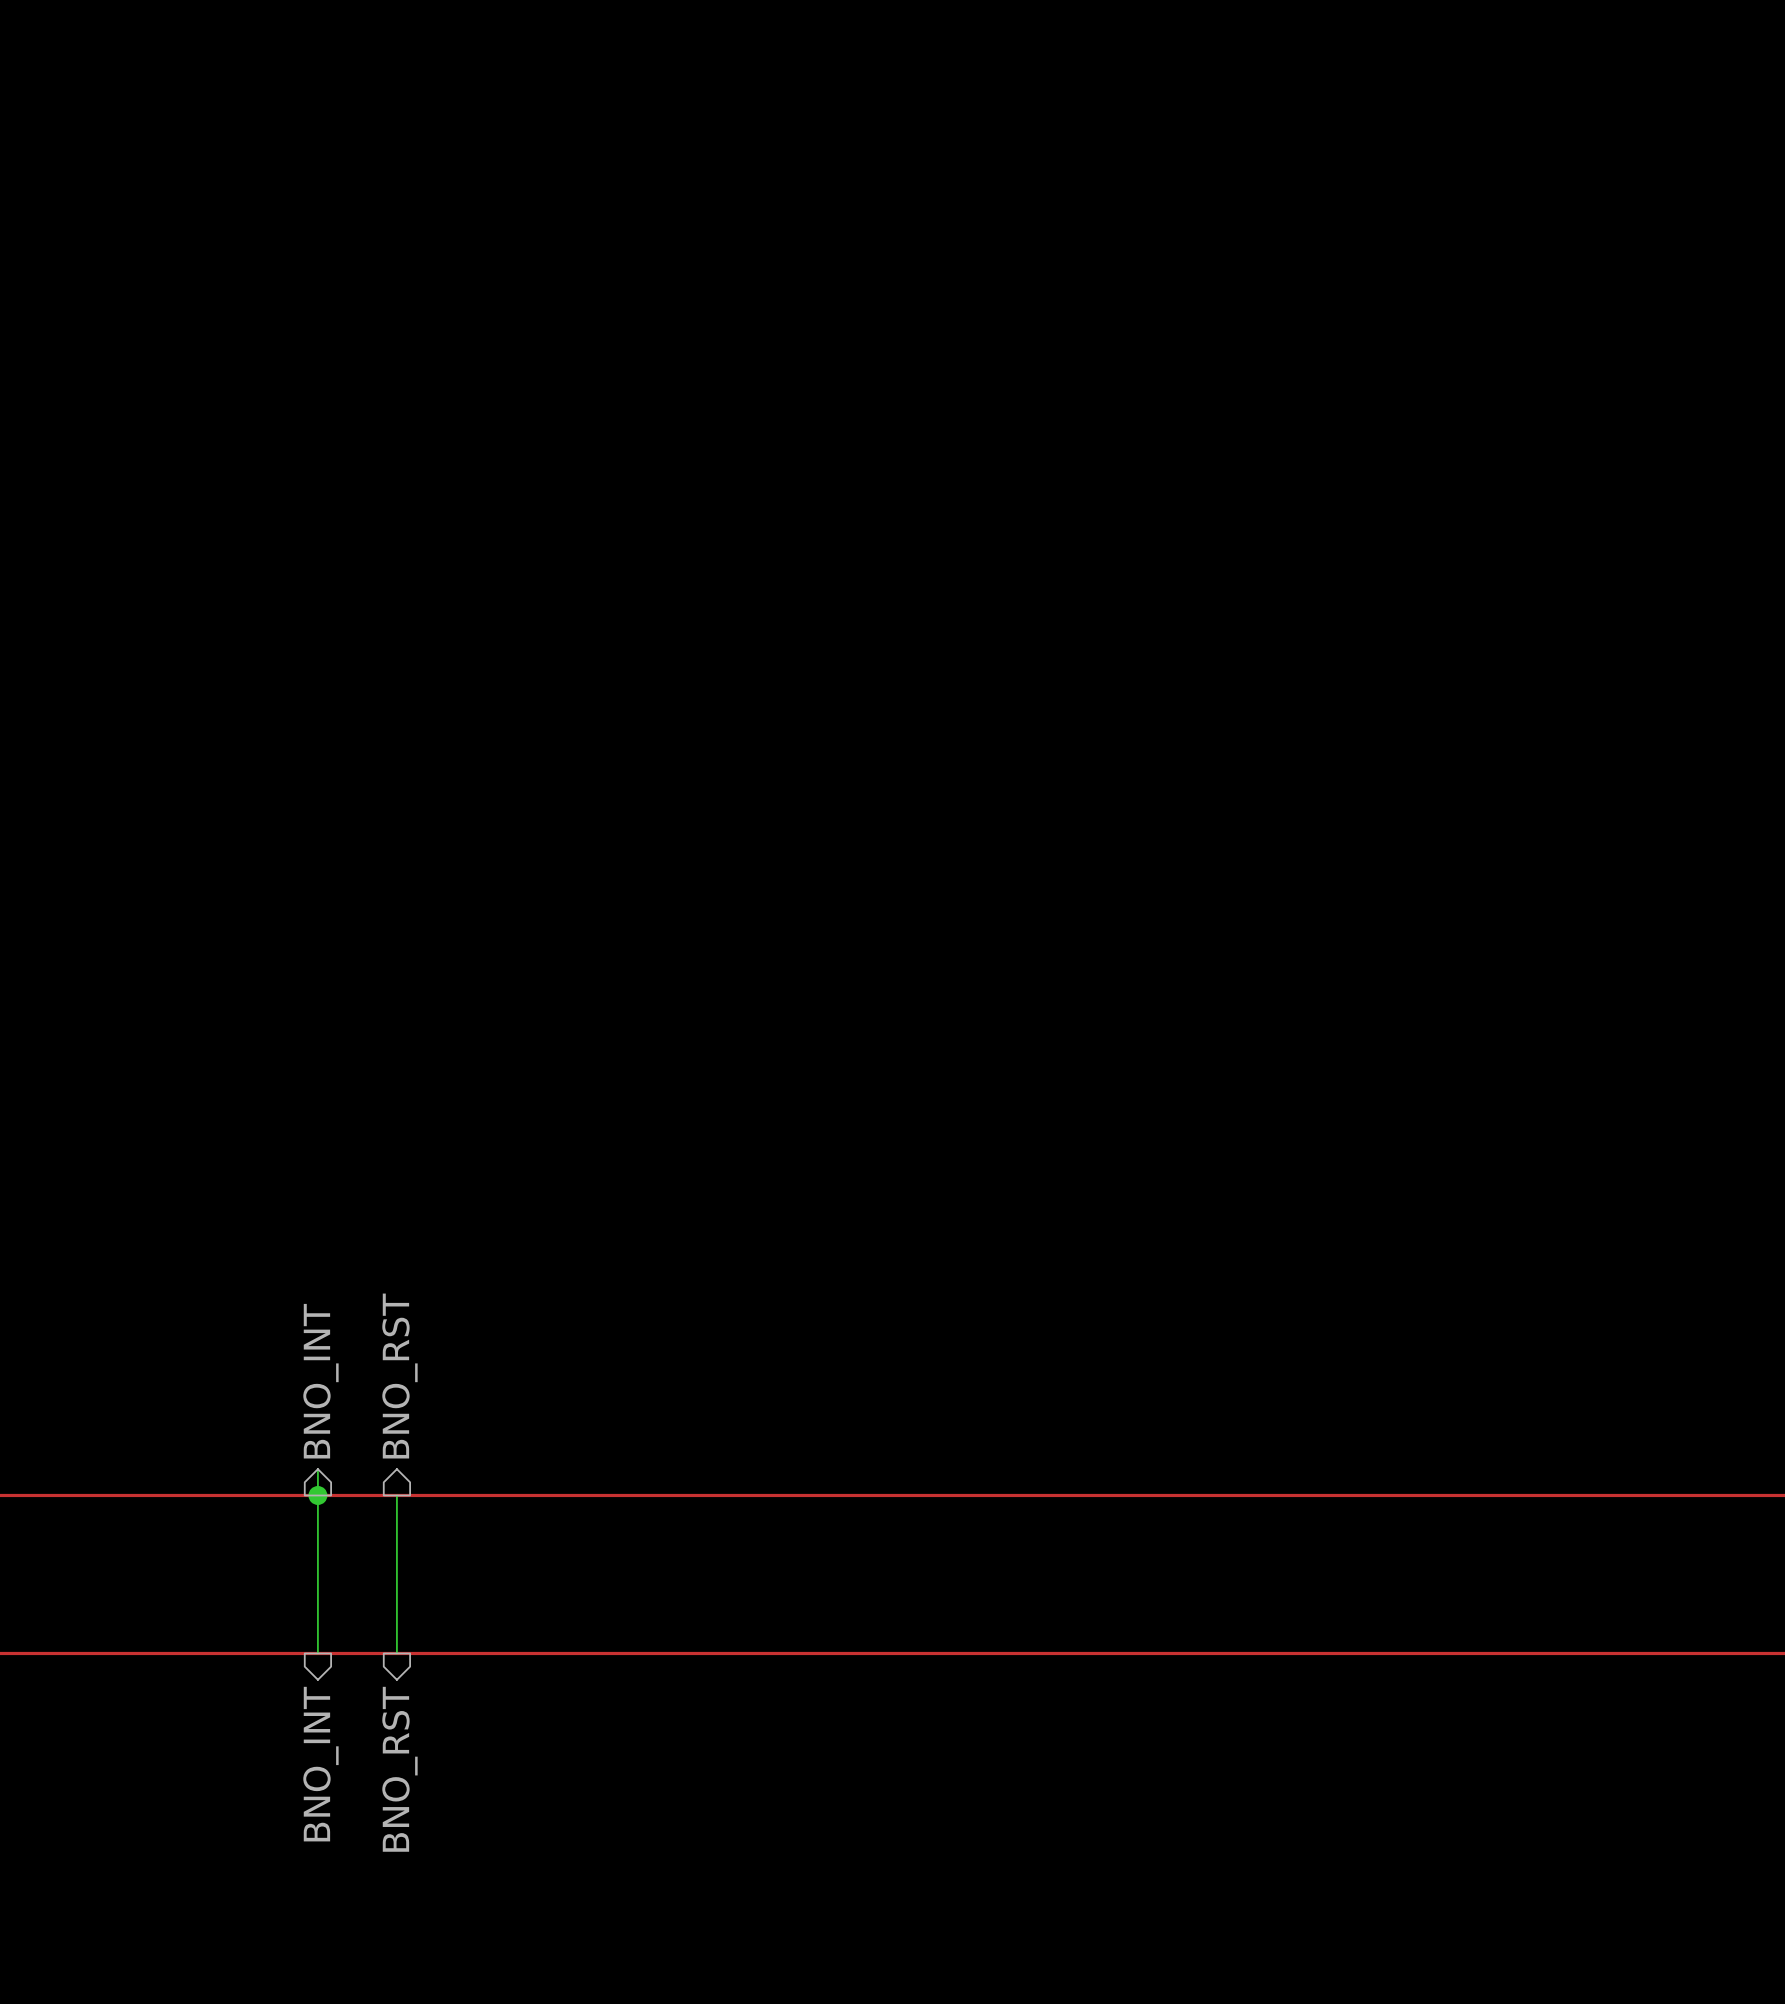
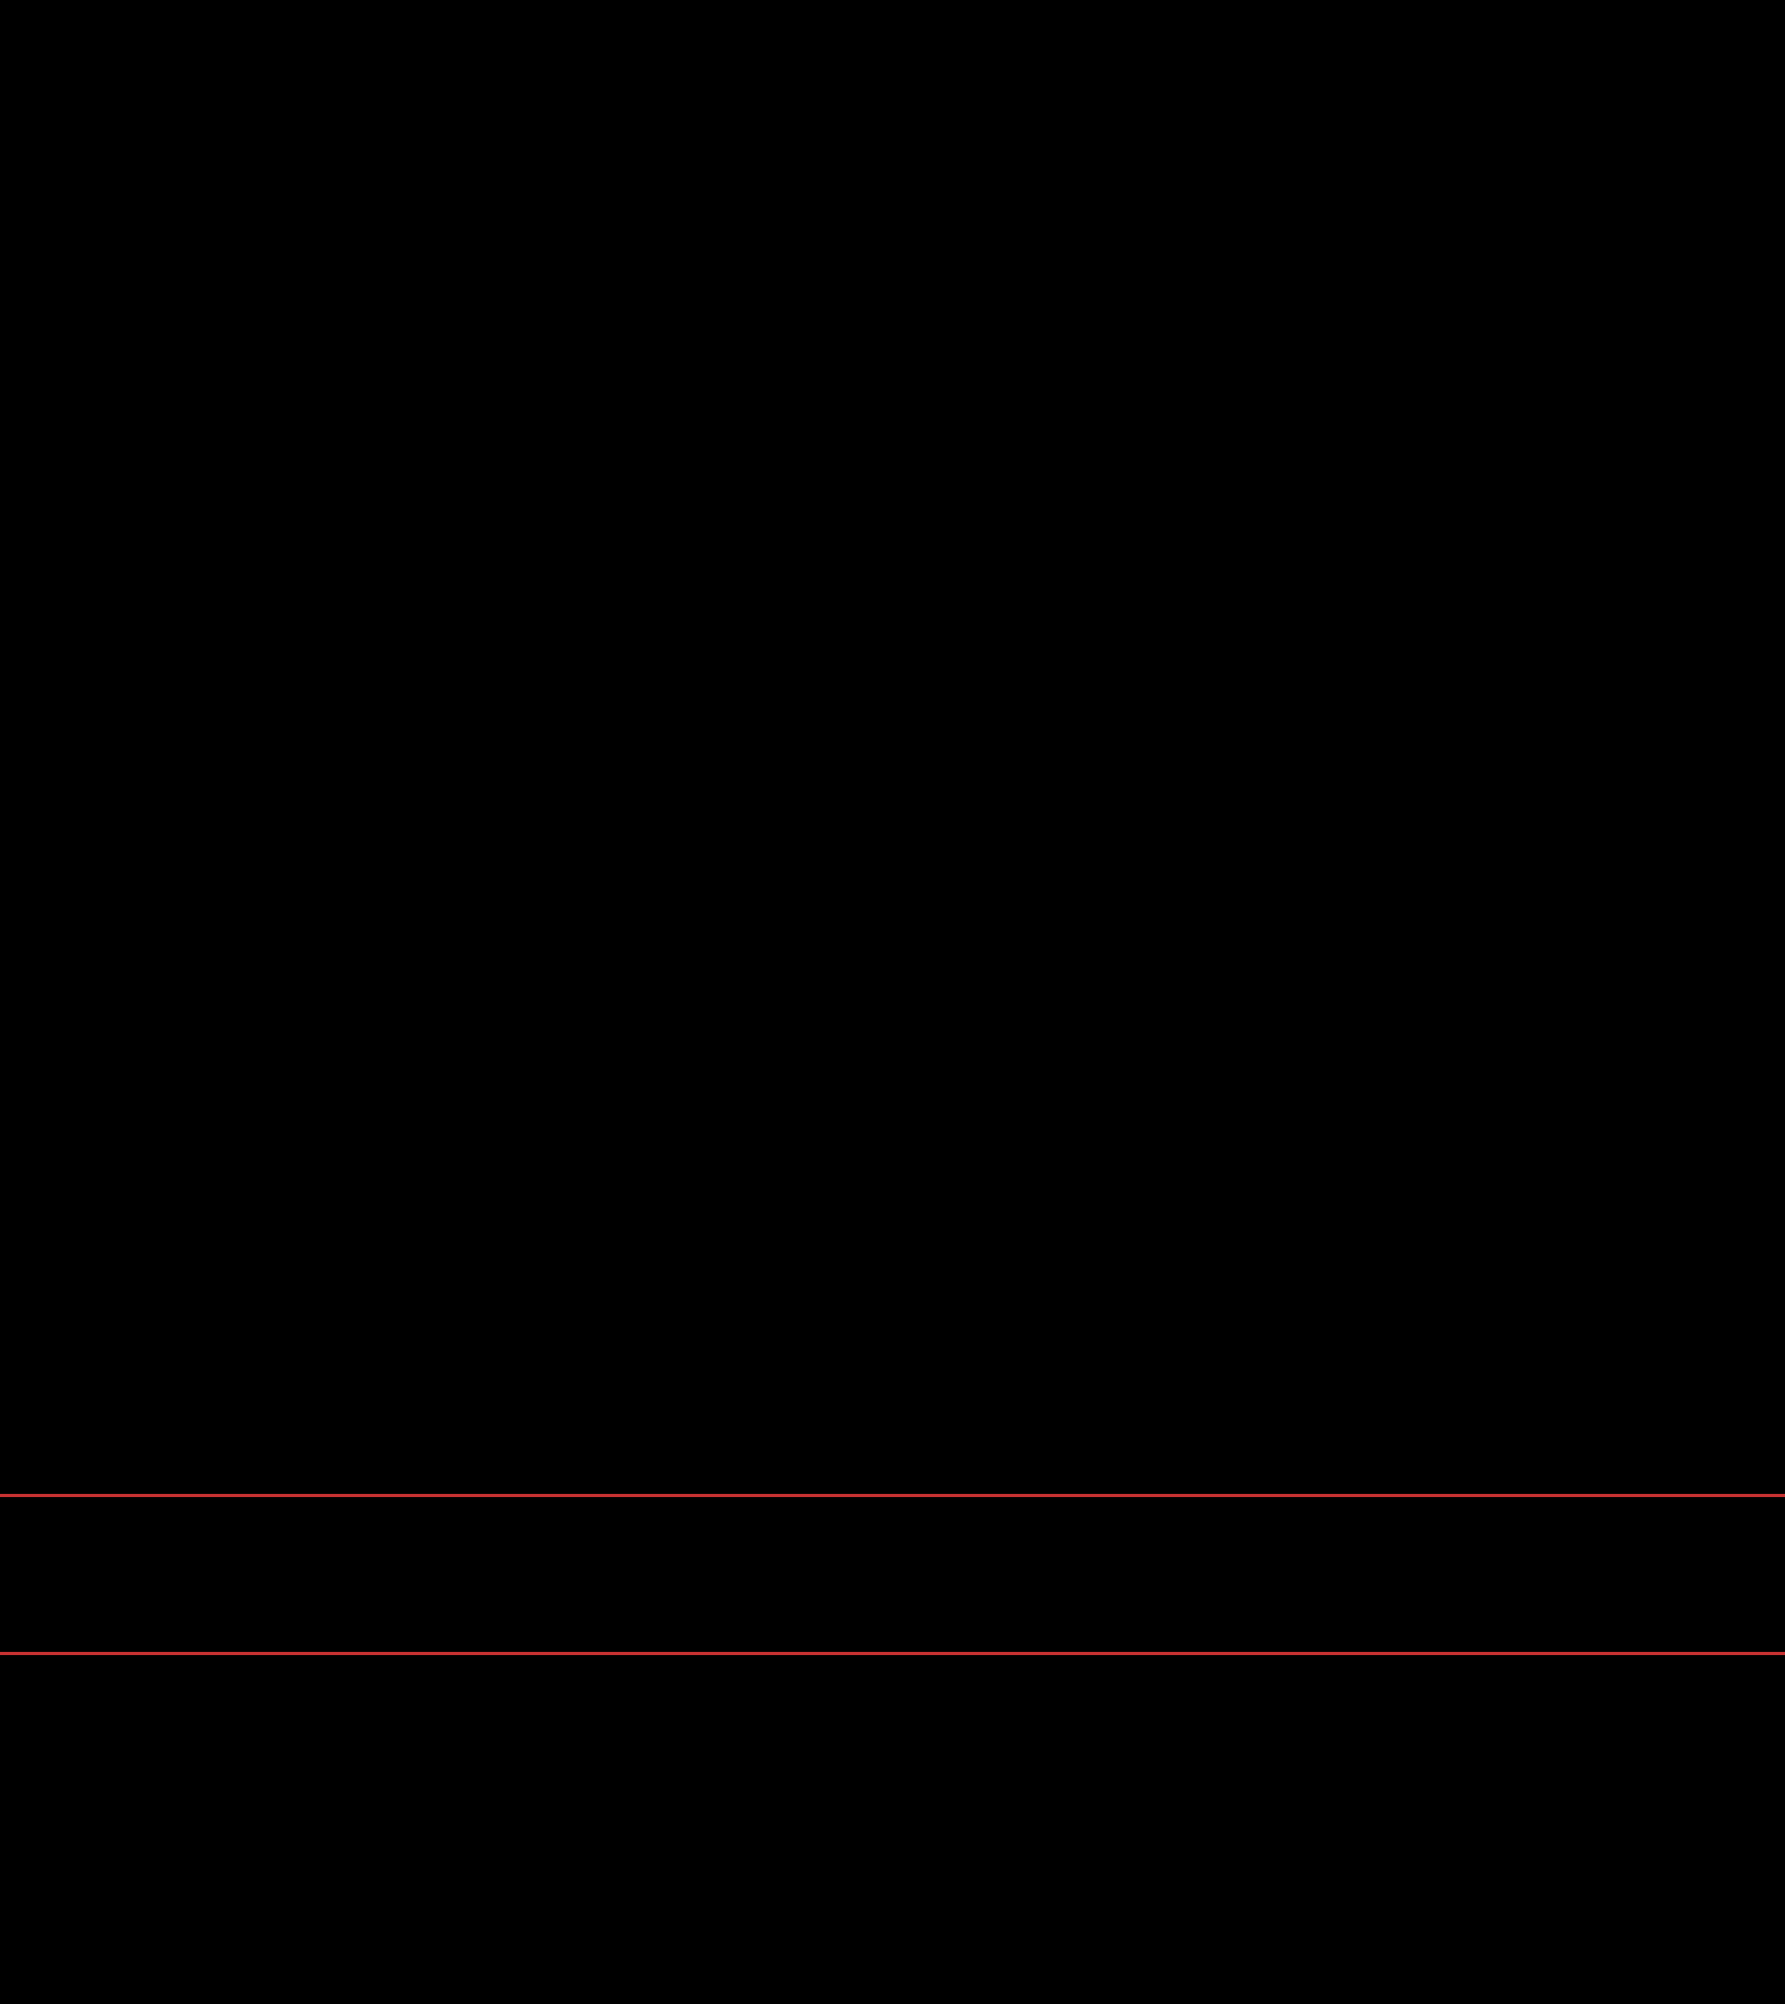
sheet pin: BNO_RST (399, 1376) -> none
sheet pin: BNO_INT (320, 1381) -> none
wire: (317, 1469) (317, 1653) -> none
junction: (317, 1495) -> none
wire: (396, 1495) (396, 1653) -> none
sheet pin: BNO_INT (320, 1764) -> none
sheet pin: BNO_RST (399, 1769) -> none

